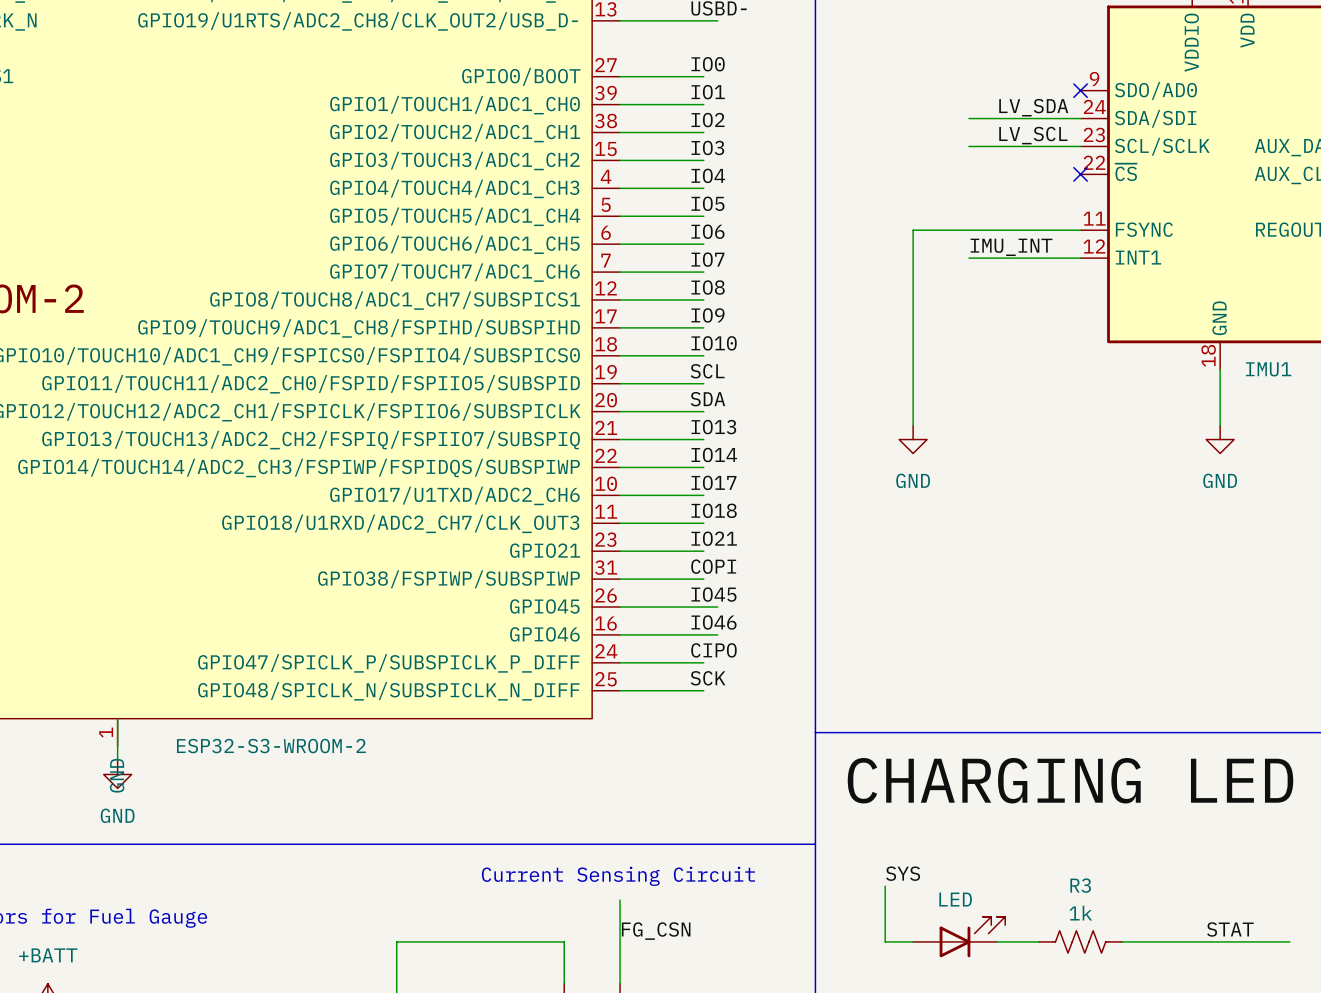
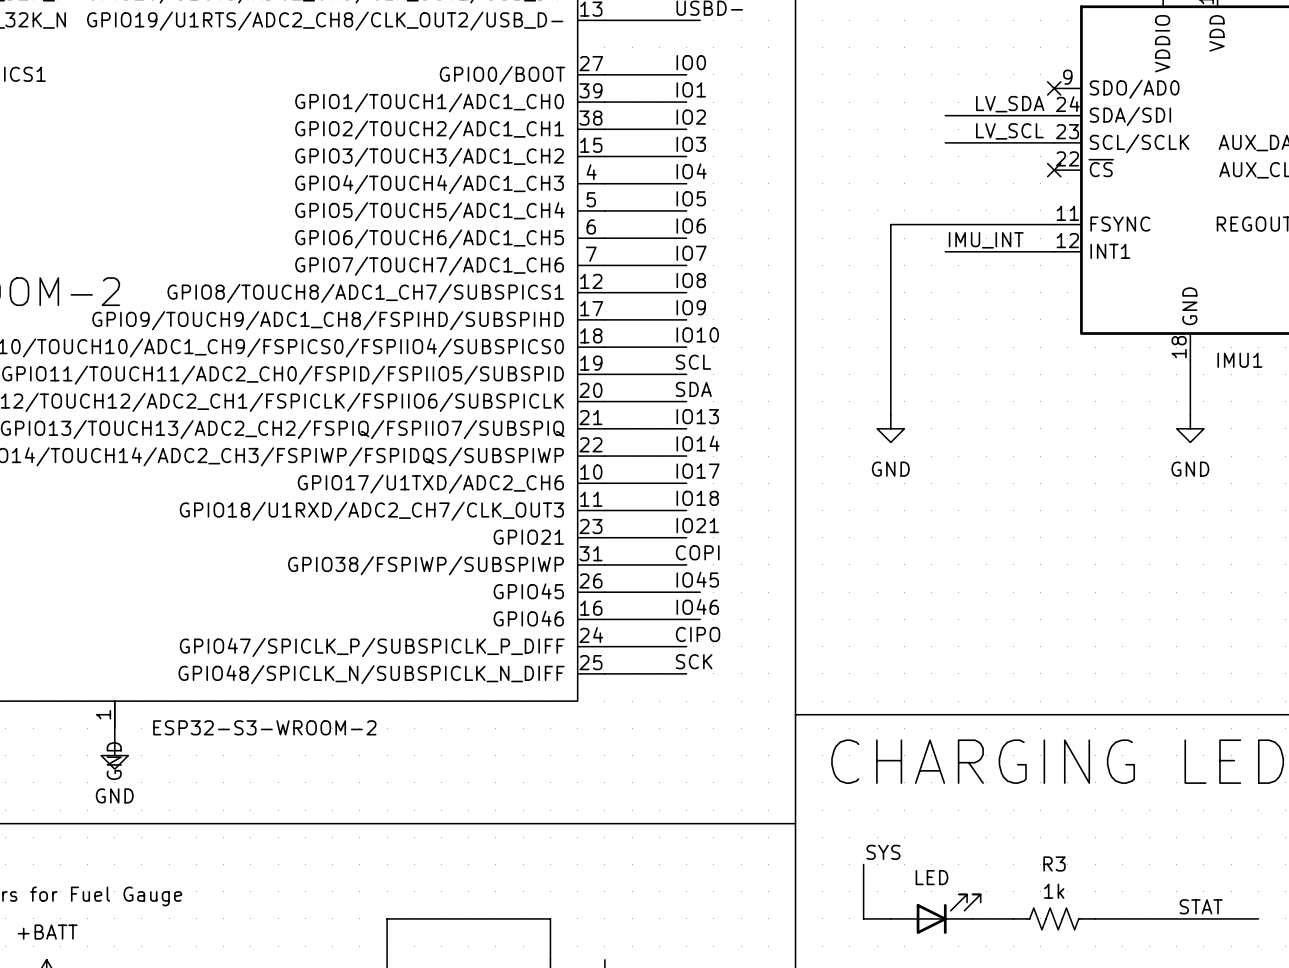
text: Current Sensing Circuit (618, 876) -> none
wire: (620, 900) (620, 983) -> none
label: FG_CSN (656, 931) -> none

